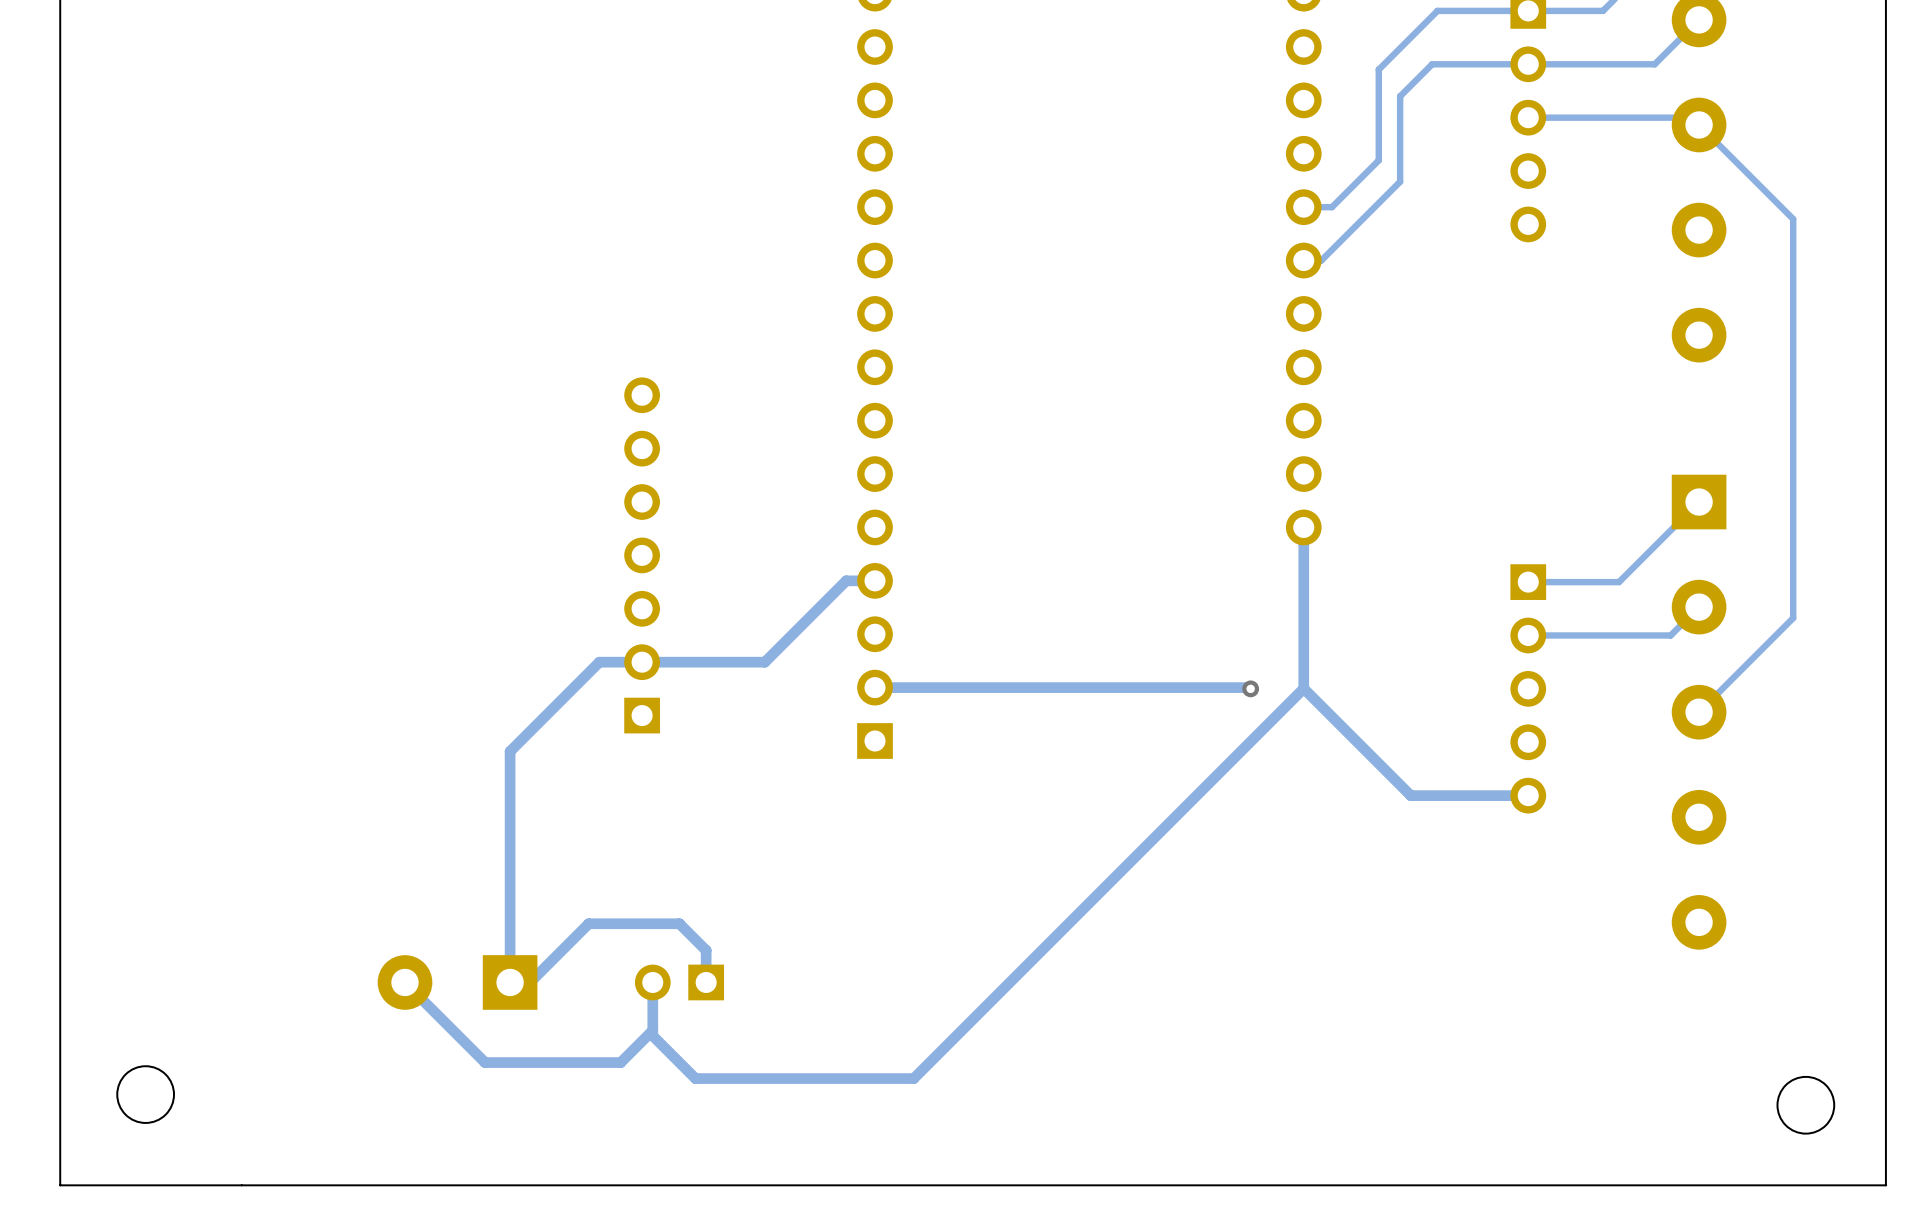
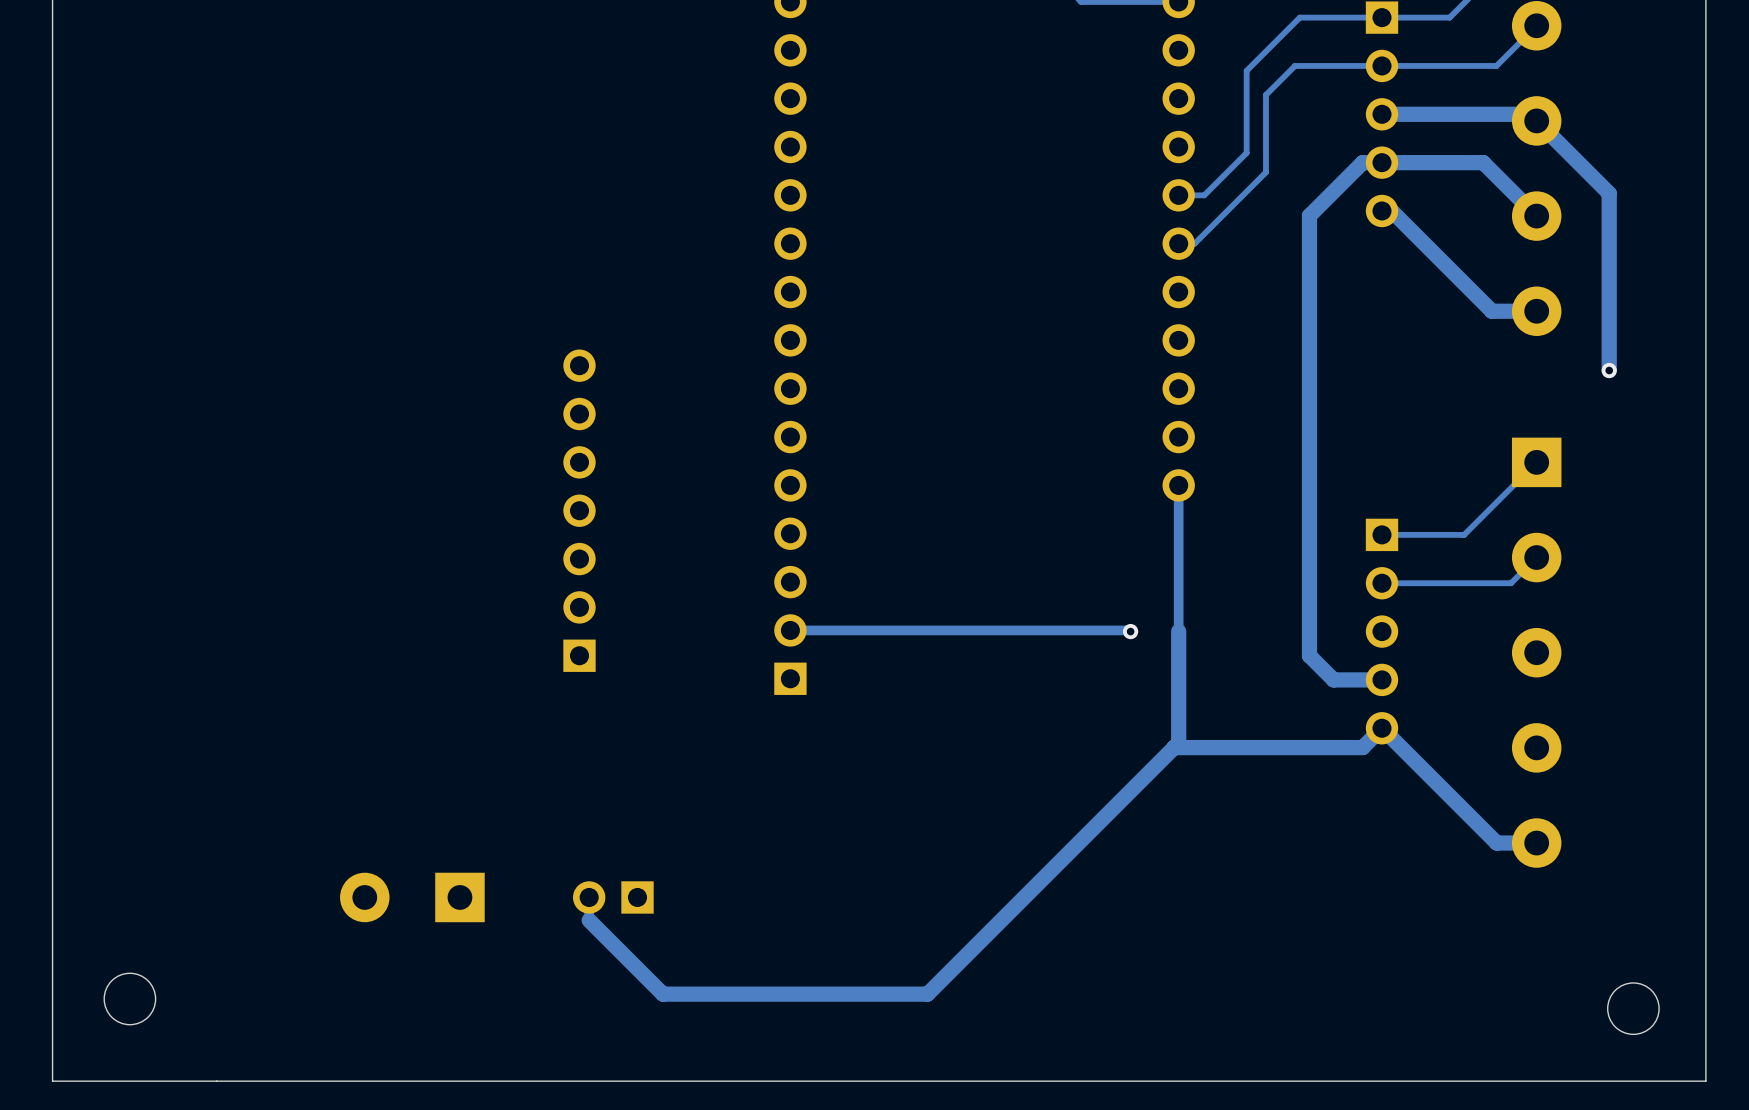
track width: thin (1528, 117) (1691, 117) (1779, 205) -> thick (1382, 114) (1530, 114) (1609, 193)
track: (1779, 205) (1793, 219) (1793, 618) (1699, 712) -> (1609, 193) (1609, 370)
track: none -> (1382, 210) (1391, 210) (1491, 311) (1536, 311)
track: none -> (1536, 216) (1483, 162) (1362, 162) (1309, 215) (1309, 655) (1333, 679) (1382, 679)
via: none -> (1609, 370)
track: (875, 580) (846, 580) (764, 662) (599, 662) (510, 751) (510, 982) (529, 982) (588, 923) (679, 923) (706, 950) (706, 982) -> none
track: (1528, 795) (1410, 795) (1303, 688) (913, 1078) (695, 1078) (652, 1035) (652, 1007) -> (1178, 631) (1178, 743) (927, 994) (662, 994) (589, 920)
track: none -> (1174, 747) (1362, 747) (1382, 728) (1496, 843) (1536, 843)
track: (405, 982) (485, 1062) (620, 1062) (652, 1030) -> none

